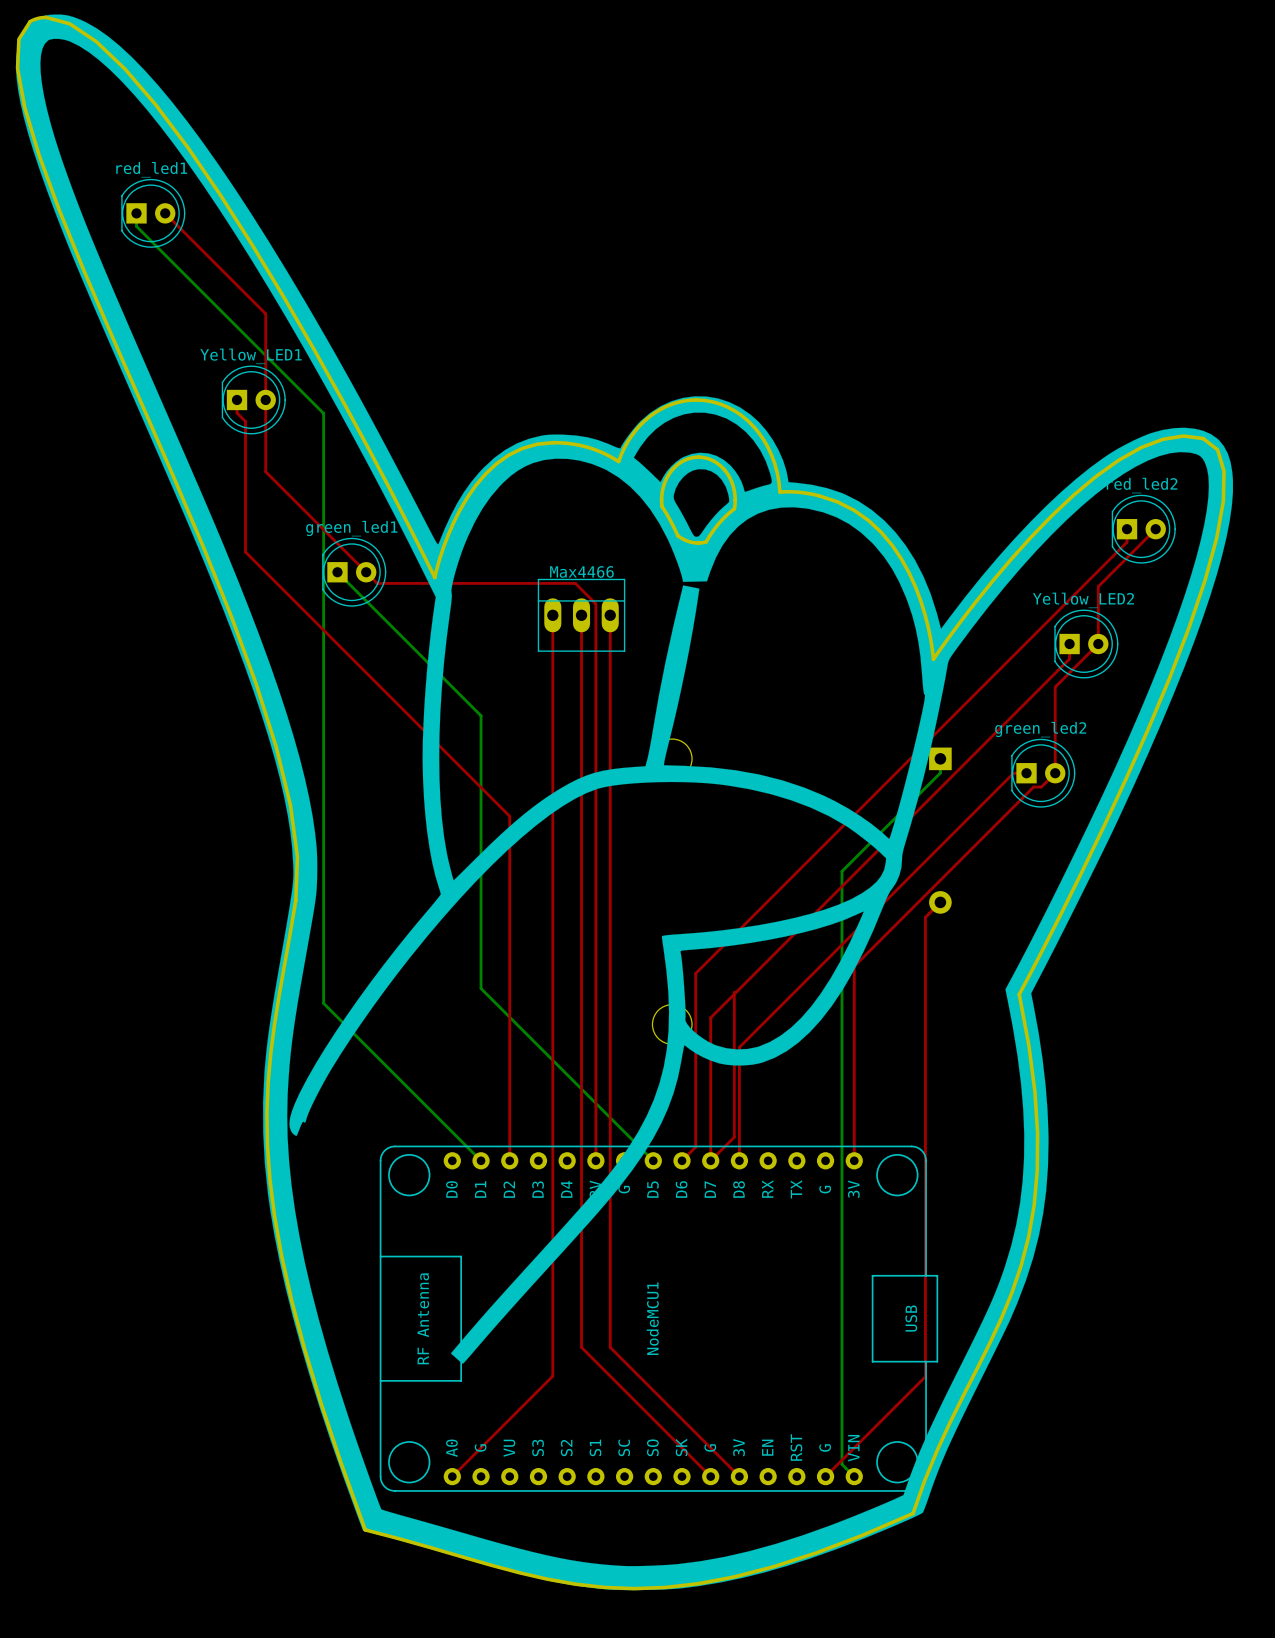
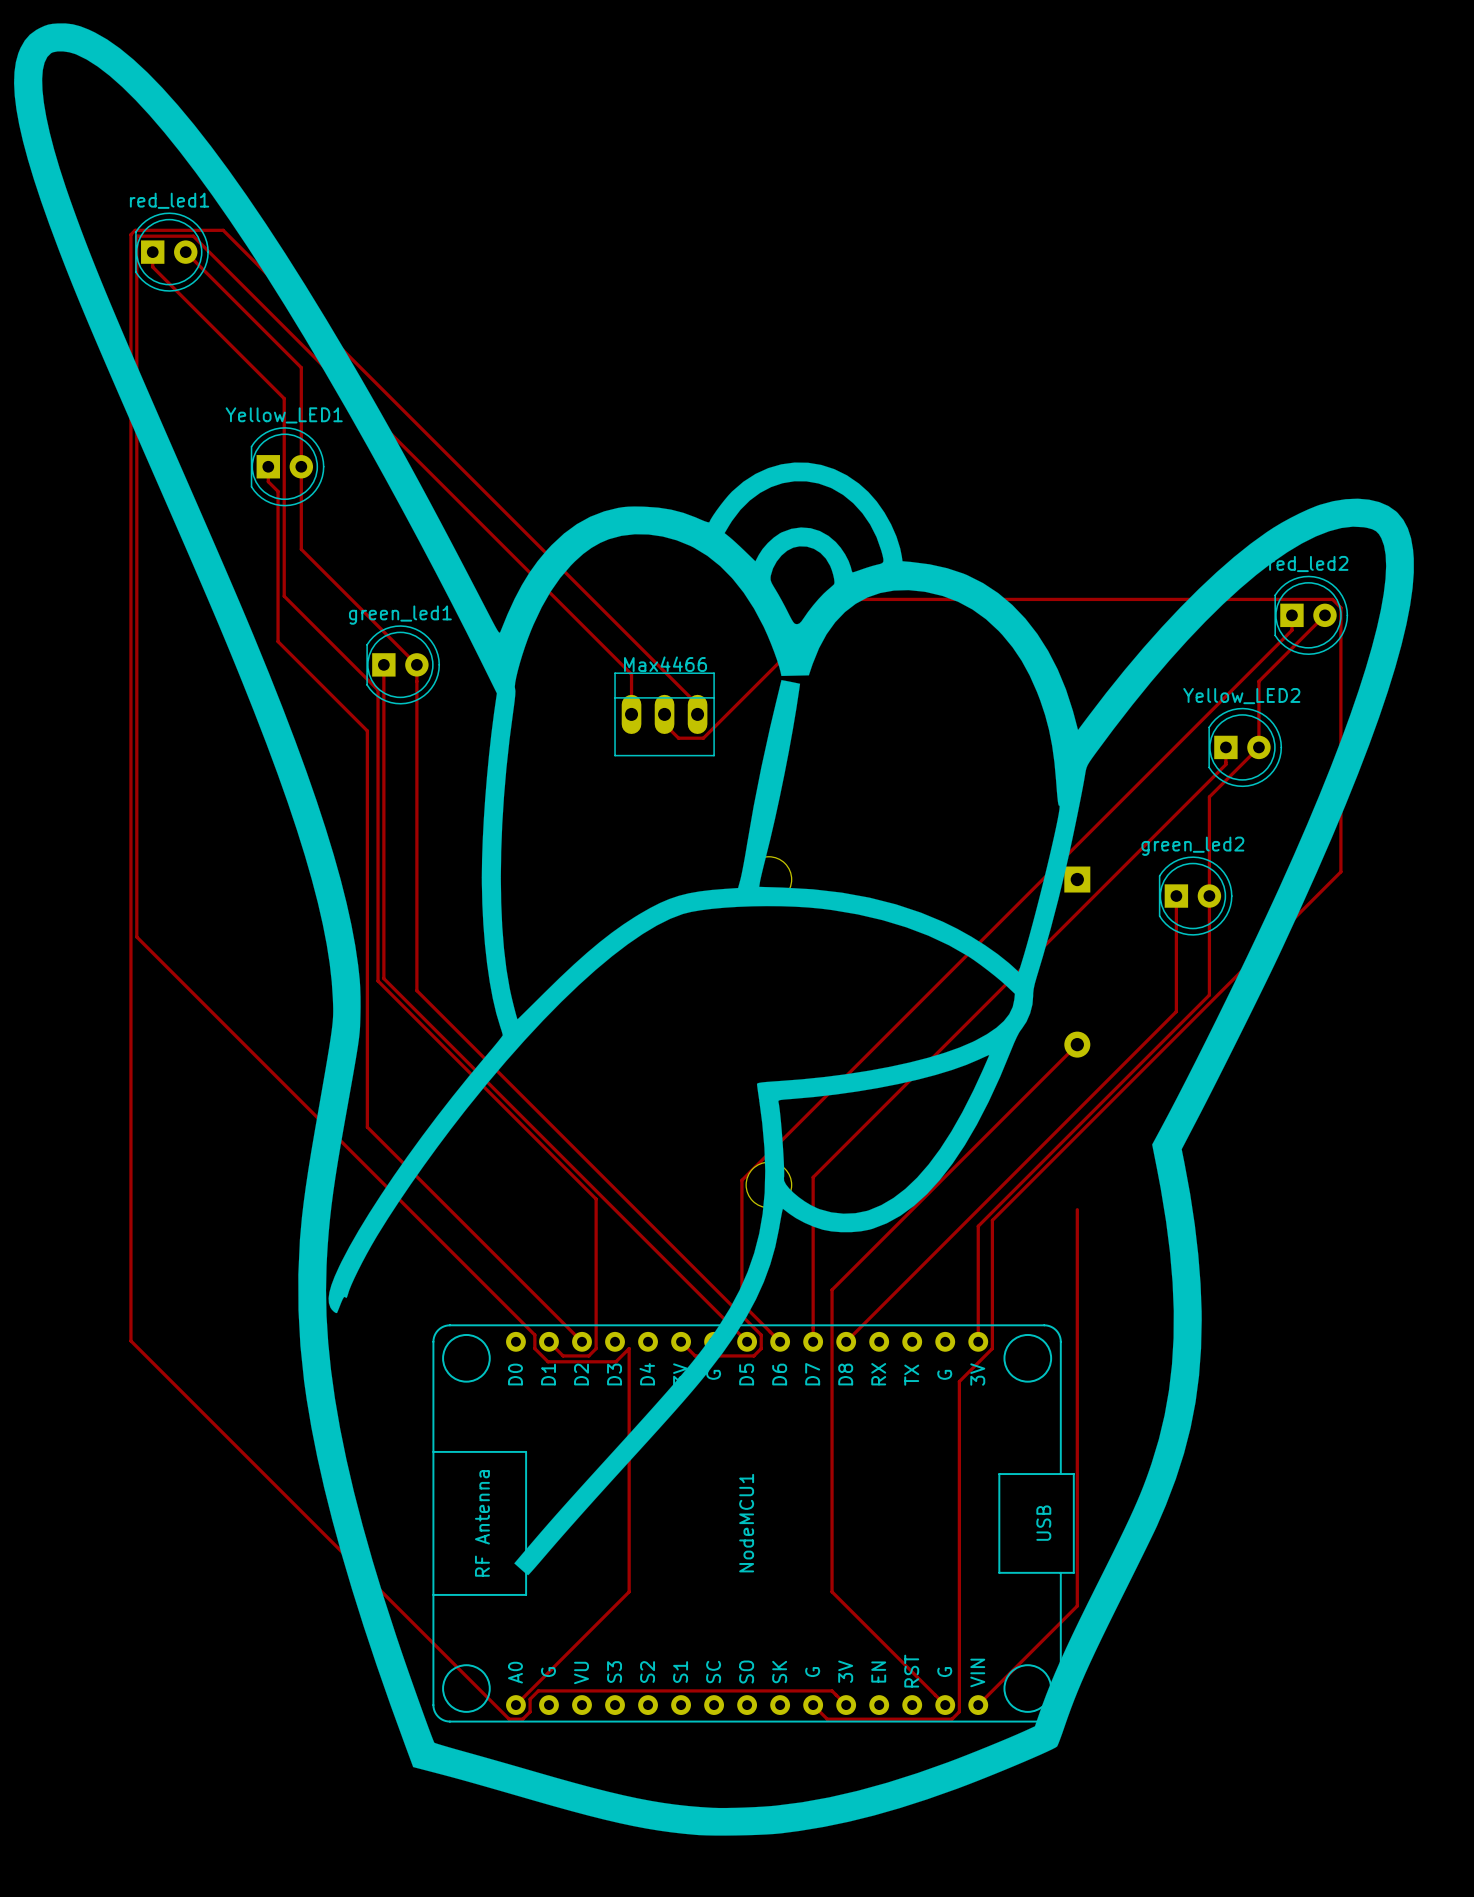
board edge: (46, 17) (69, 23) (96, 41) (125, 69) (155, 104) (187, 147) (252, 245) (314, 349) (368, 447) (434, 577) (448, 534) (467, 497) (485, 474) (508, 455) (536, 444) (562, 442) (593, 449) (618, 461) (631, 436) (654, 413) (677, 402) (704, 400) (720, 404) (734, 410) (747, 420) (759, 433) (768, 447) (774, 464) (779, 492) (808, 493) (837, 501) (854, 510) (881, 532) (901, 559) (915, 587) (928, 626) (933, 659) (975, 601) (1010, 559) (1051, 515) (1096, 476) (1141, 447) (1162, 439) (1183, 436) (1203, 438) (1217, 449) (1224, 471) (1223, 501) (1216, 538) (1188, 627) (1126, 778) (1082, 871) (1019, 994) (1028, 1045) (1037, 1133) (1037, 1171) (1028, 1236) (1021, 1265) (1001, 1318) (937, 1450) (912, 1513) (862, 1535) (773, 1566) (698, 1583) (634, 1588) (604, 1587) (547, 1579) (365, 1529) (341, 1463) (304, 1349) (281, 1256) (269, 1178) (266, 1112) (270, 1052) (295, 900) (297, 856) (290, 805) (276, 747) (256, 683) (231, 616) (173, 476) (84, 271) (39, 155) (24, 107) (17, 68) (18, 39) (30, 21) (46, 17) -> none
bottom track: (136, 213) (136, 226) (323, 413) (323, 1003) (481, 1160) -> none
top track: none -> (152, 252) (152, 267) (284, 398) (284, 596) (378, 690) (378, 981) (596, 1199) (596, 1348) (588, 1355) (563, 1355) (548, 1341)
board edge: (698, 457) (684, 460) (672, 469) (664, 483) (661, 500) (662, 506) (677, 535) (687, 541) (698, 543) (706, 542) (719, 522) (734, 508) (735, 500) (732, 483) (724, 469) (712, 460) (698, 457) -> none
bottom track: (337, 572) (481, 715) (481, 988) (653, 1160) -> none
top track: none -> (383, 664) (383, 978) (747, 1341)
top track: (366, 572) (377, 583) (575, 583) (595, 603) (595, 1160) -> (416, 664) (416, 990) (761, 1335) (761, 1348) (753, 1355) (695, 1355) (681, 1341)
top track: (552, 615) (552, 1376) (550, 1378) -> (631, 714) (631, 674) (193, 236) (136, 237) (136, 936) (534, 1335) (534, 1348) (548, 1361) (615, 1361) (629, 1348) (629, 1591)
top track: (610, 615) (610, 1347) (727, 1464) -> (697, 714) (697, 704) (223, 230) (135, 230) (130, 234) (130, 1340) (509, 1719) (522, 1719) (530, 1711) (530, 1699) (538, 1690) (832, 1690)
top track: (581, 623) (581, 1347) (710, 1476) -> (664, 724) (678, 738) (703, 738) (842, 599) (1332, 599) (1340, 607) (1340, 871) (992, 1220) (992, 1348) (959, 1381) (959, 1711) (952, 1719) (827, 1719) (813, 1705)
top track: (323, 629) (509, 816) (509, 1160) -> (367, 730) (367, 1127) (582, 1341)
bottom track: (940, 758) (940, 772) (841, 871) (841, 1464) (854, 1476) -> none
top track: (1026, 773) (1013, 773) (739, 1047) (739, 1160) -> (1176, 896) (1176, 1011) (846, 1341)
top track: (1055, 773) (1041, 787) (1033, 787) (854, 966) (854, 1060) -> (1209, 896) (1209, 995) (978, 1226)
top track: (925, 917) (925, 1376) (825, 1476) -> (1060, 1061) (832, 1289) (832, 1591) (945, 1705)
top track: (695, 973) (695, 1147) (682, 1160) -> (795, 1126) (741, 1180) (741, 1303) (780, 1341)
top track: (734, 992) (734, 1137) (710, 1160) -> none
top track: none -> (1077, 1209) (1077, 1605) (978, 1705)

